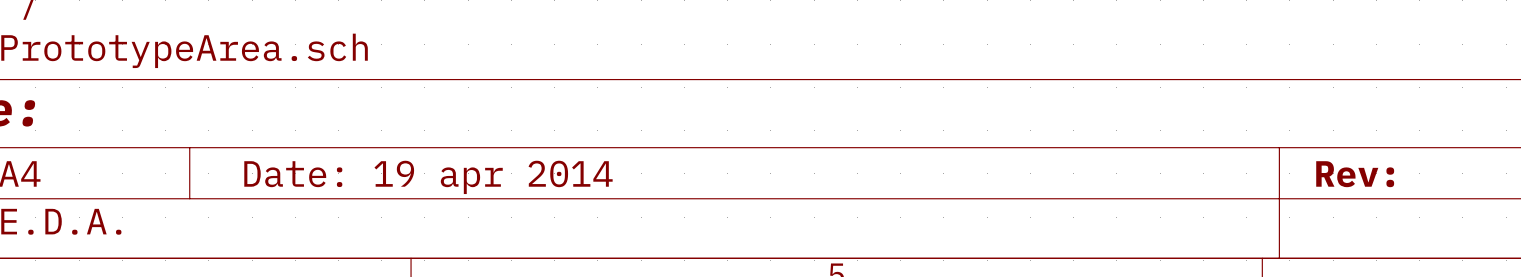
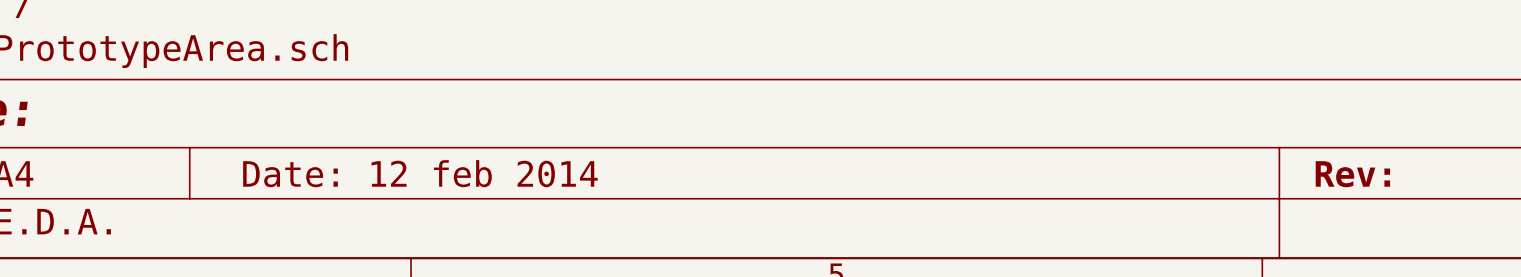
title block: Date: 19 apr 2014 (428, 177) -> Date: 12 feb 2014 (420, 173)

